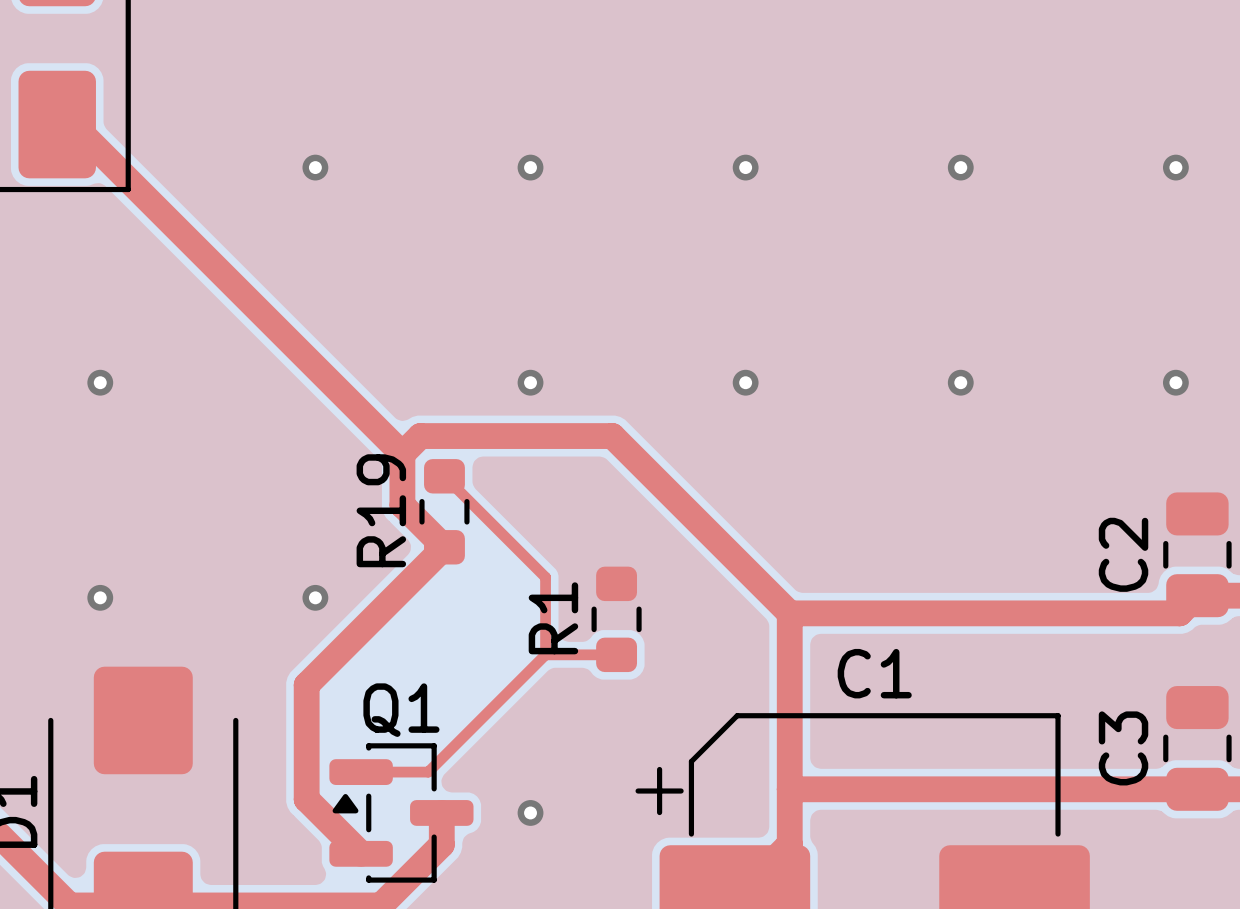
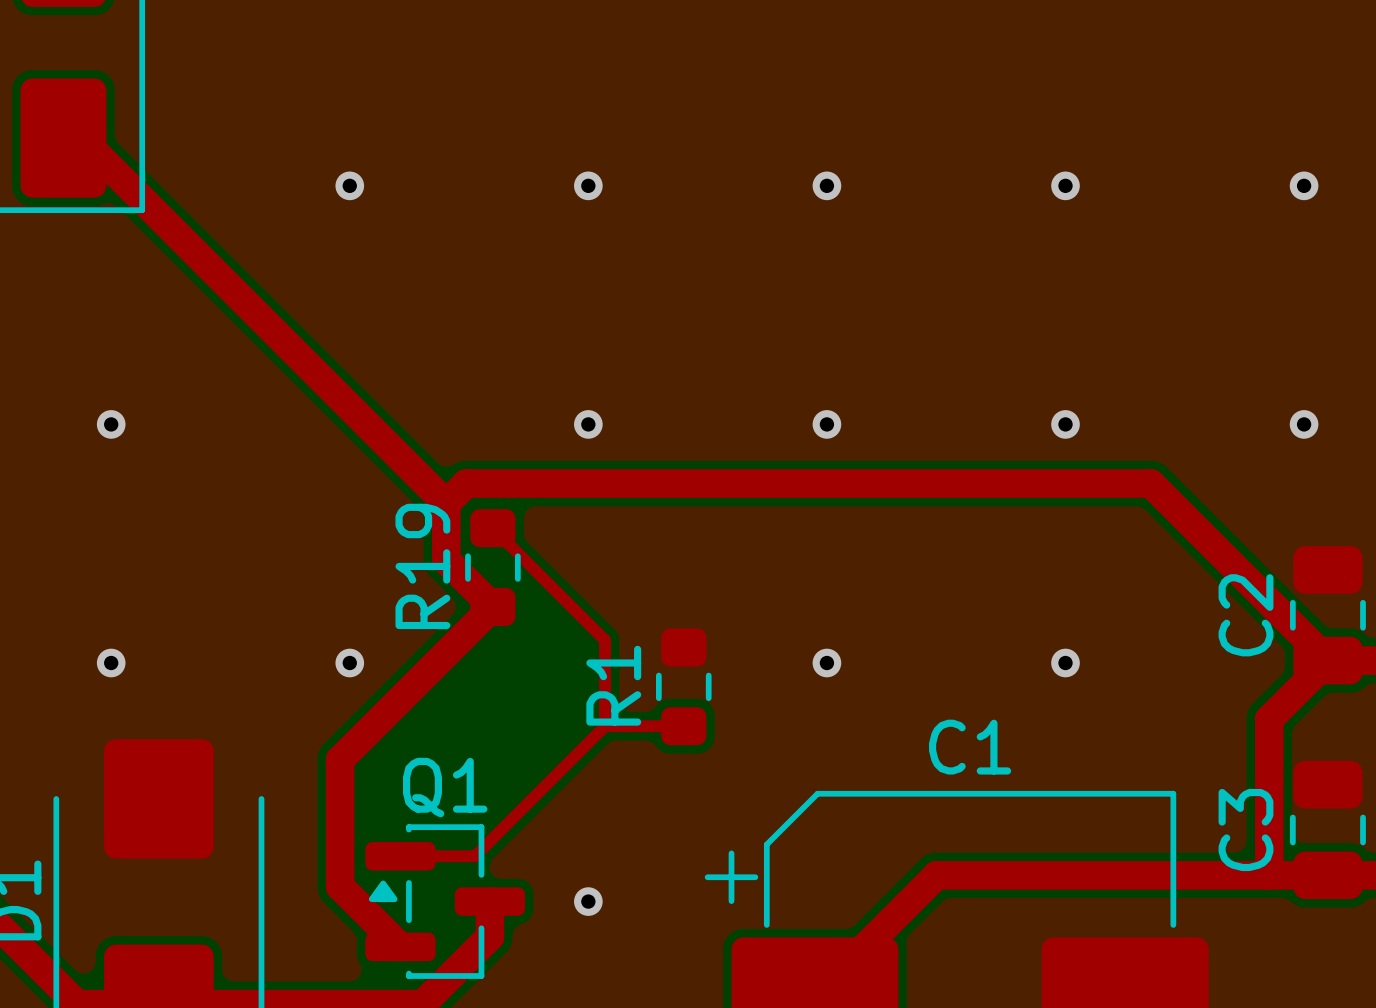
top track: (612, 436) (789, 613) -> (679, 483) (1150, 483) (1327, 660)
via: none -> (826, 663)
via: none -> (1065, 663)
top track: (789, 613) (1179, 613) -> (1269, 875) (1269, 719) (1308, 680)
top track: (789, 613) (789, 844) -> none
top track: (789, 789) (844, 789) -> (875, 936) (936, 875)

